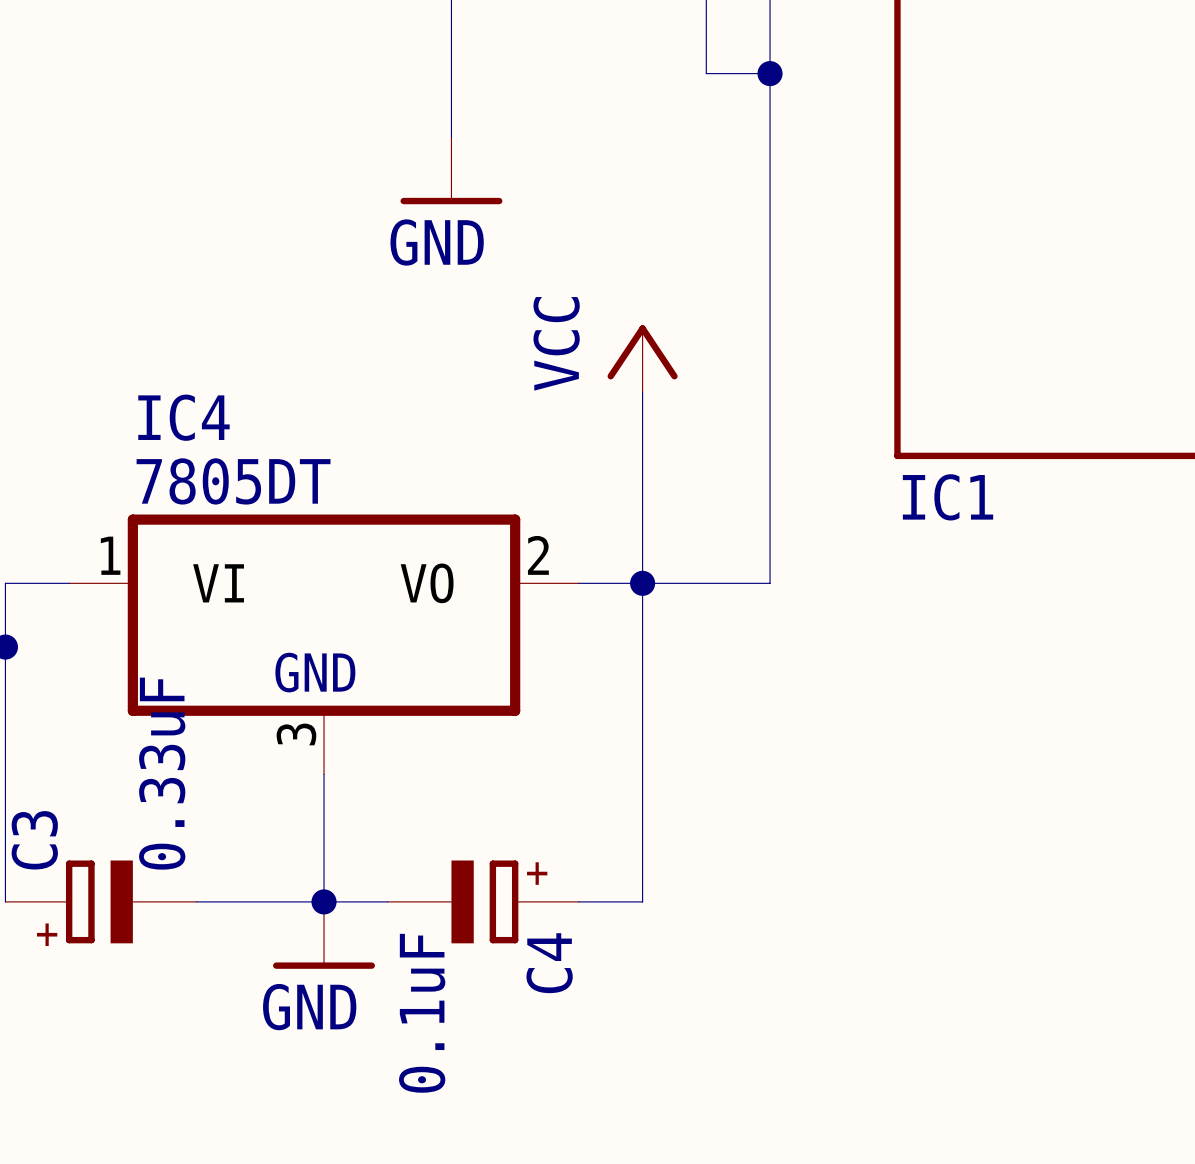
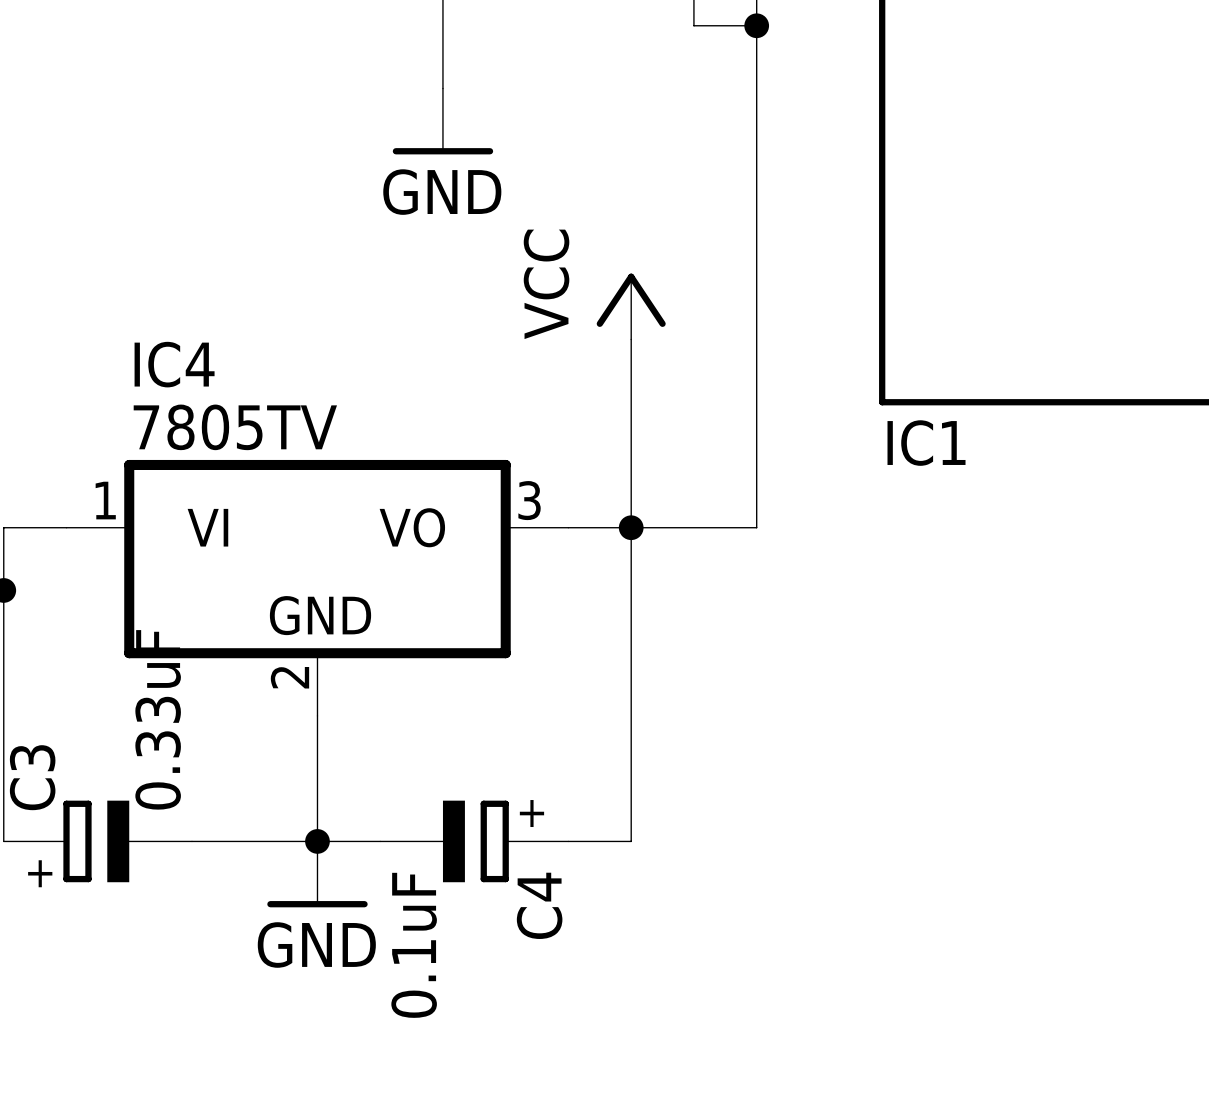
IC4 value: 7805DT (233, 481) -> 7805TV (235, 427)
IC4 pin number: 2 (538, 555) -> 3 (529, 500)
IC4 pin number: 3 (296, 734) -> 2 (289, 677)

